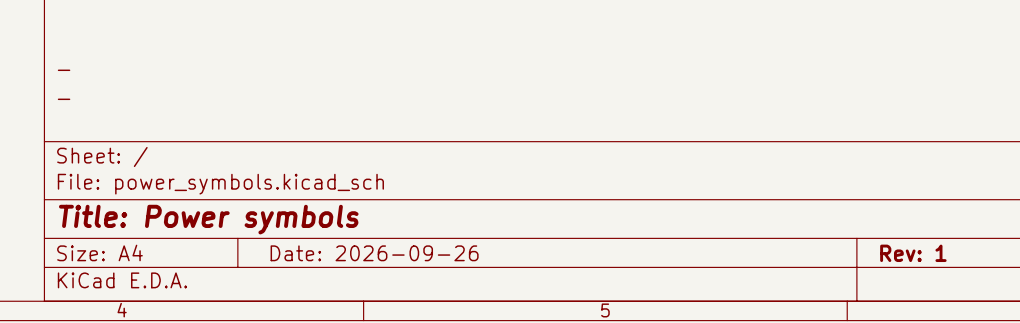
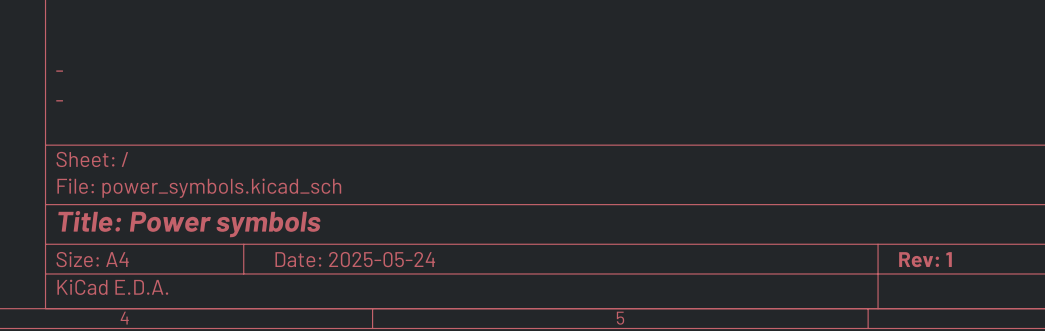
title block: Date: 2026-09-26 (374, 253) -> Date: 2025-05-24 (355, 259)

